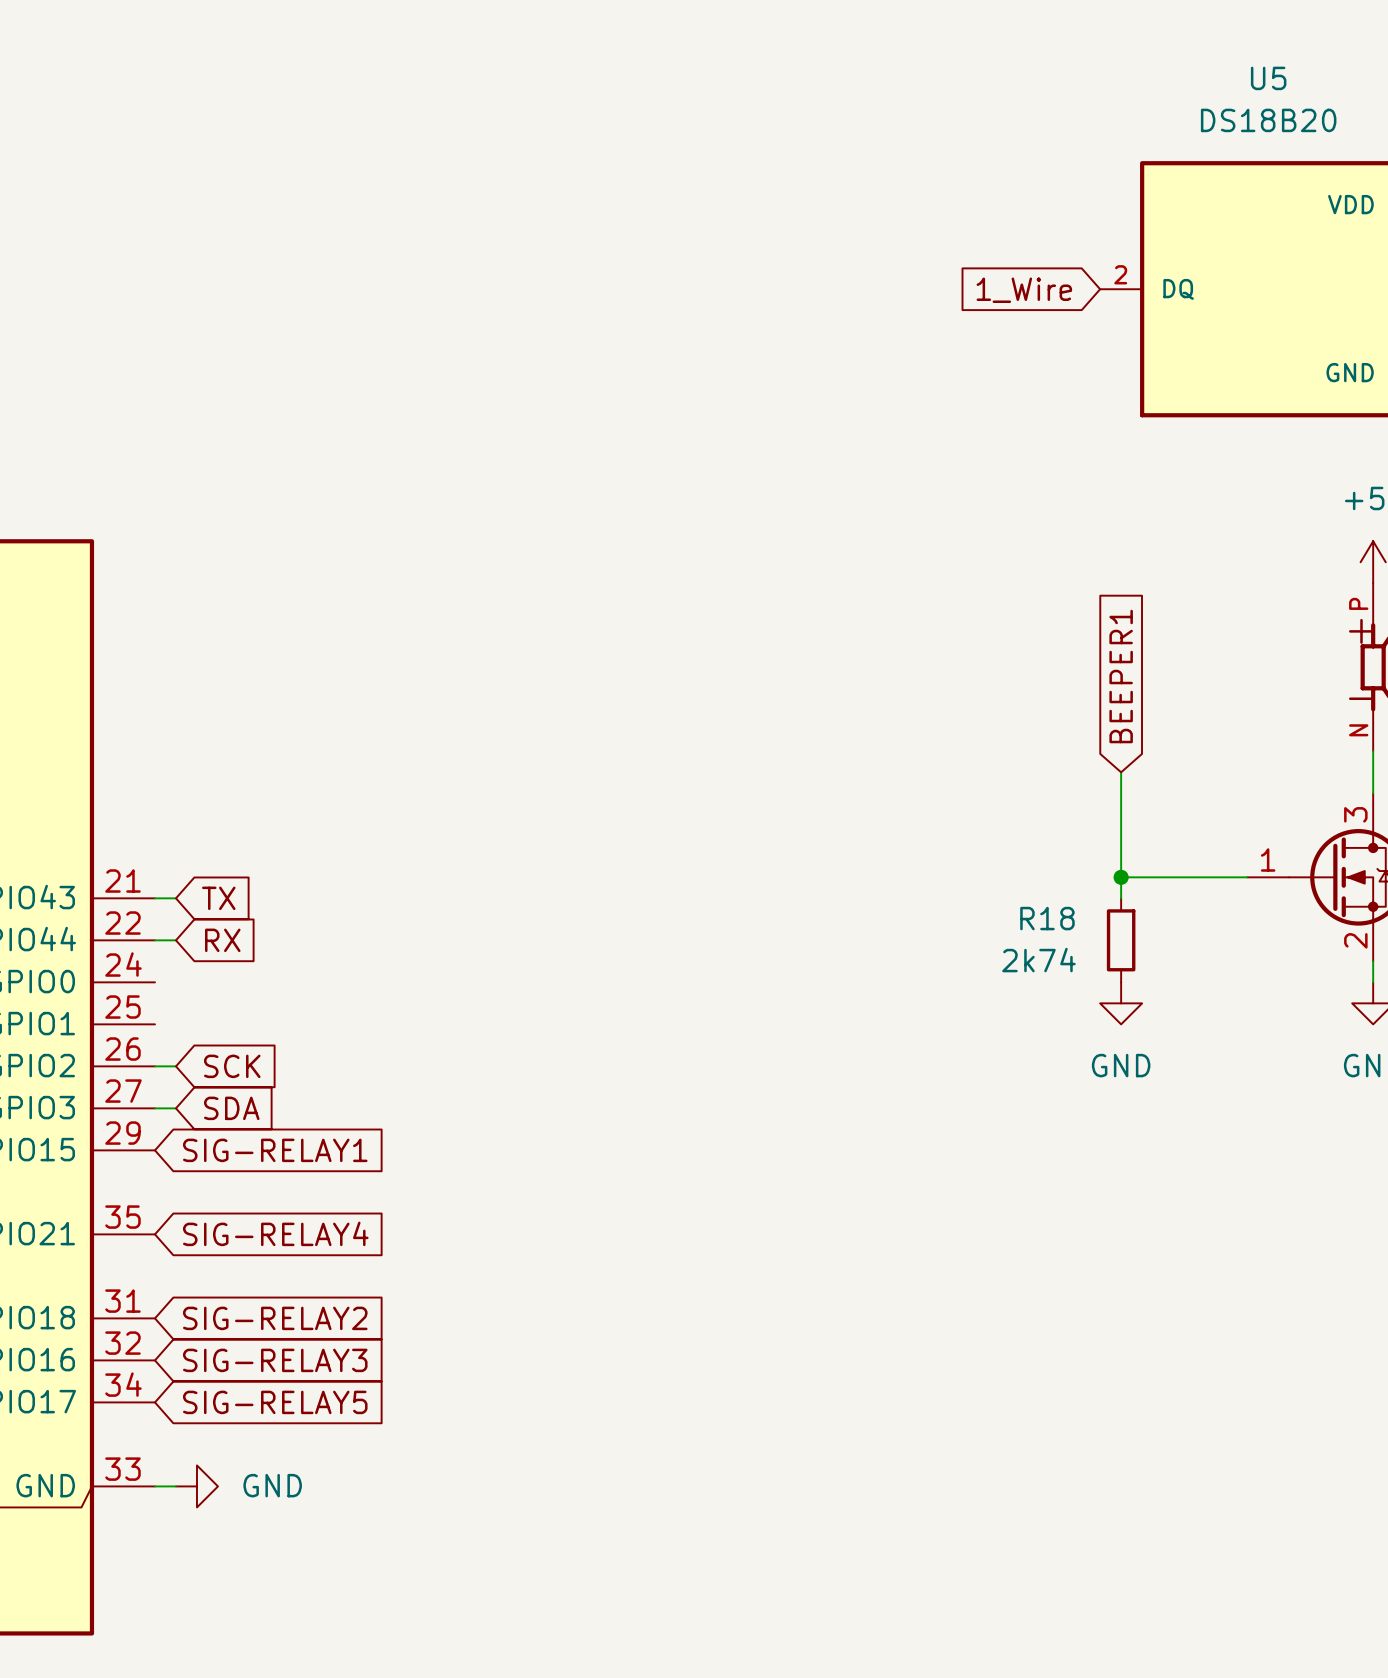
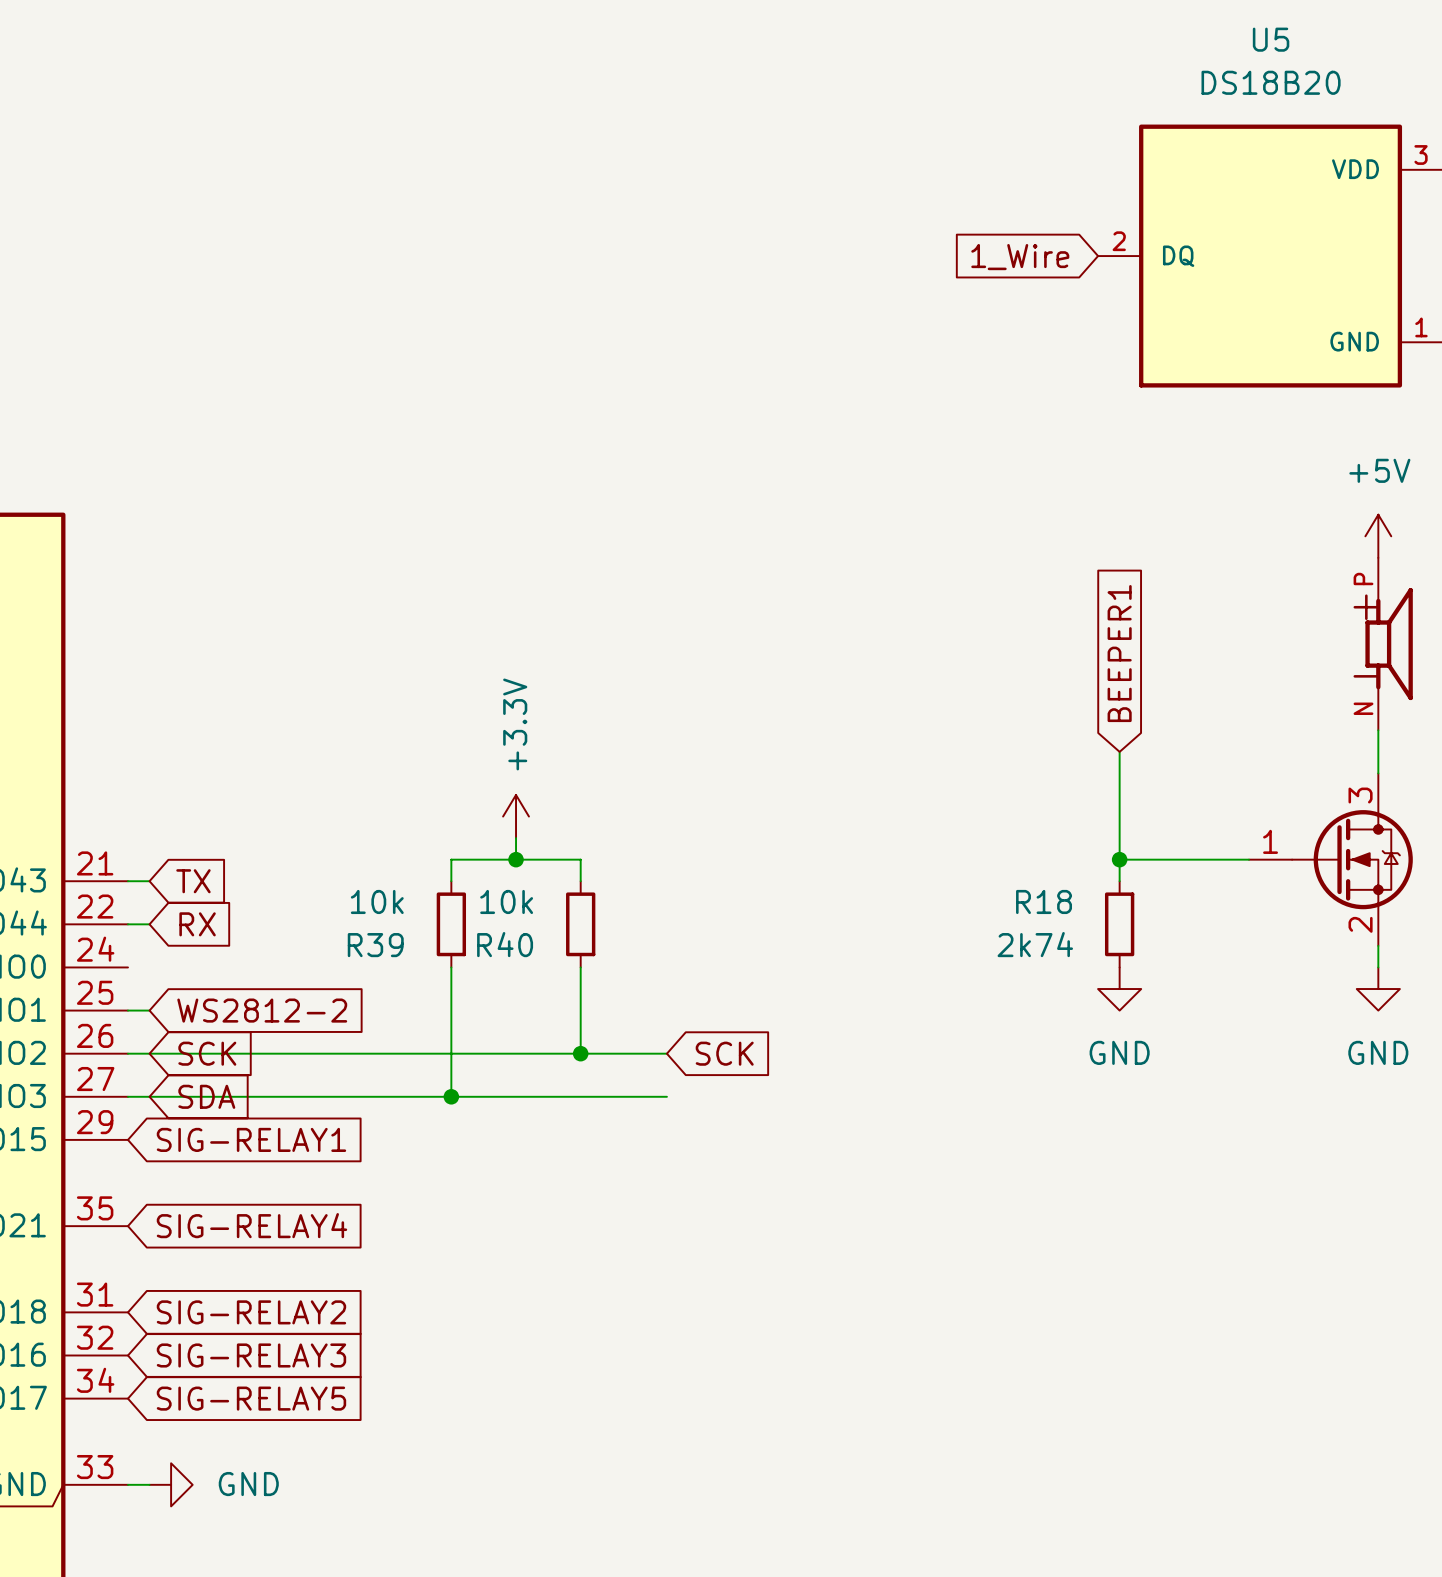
power symbol: none -> +3.3V (516, 816)
wire: none -> (516, 838) (516, 859)
junction: none -> (516, 859)
wire: none -> (451, 881) (451, 859) (580, 859) (580, 881)
R39: none -> 10k (451, 924)
R40: none -> 10k (580, 924)
wire: none -> (451, 967) (451, 1096)
wire: none -> (580, 967) (580, 1053)
wire: none -> (127, 1010) (149, 1010)
global label: none -> WS2812-2 (262, 1010)
wire: none -> (149, 1053) (666, 1053)
junction: none -> (580, 1053)
global label: none -> SCK (724, 1053)
wire: none -> (149, 1096) (666, 1096)
junction: none -> (451, 1096)

